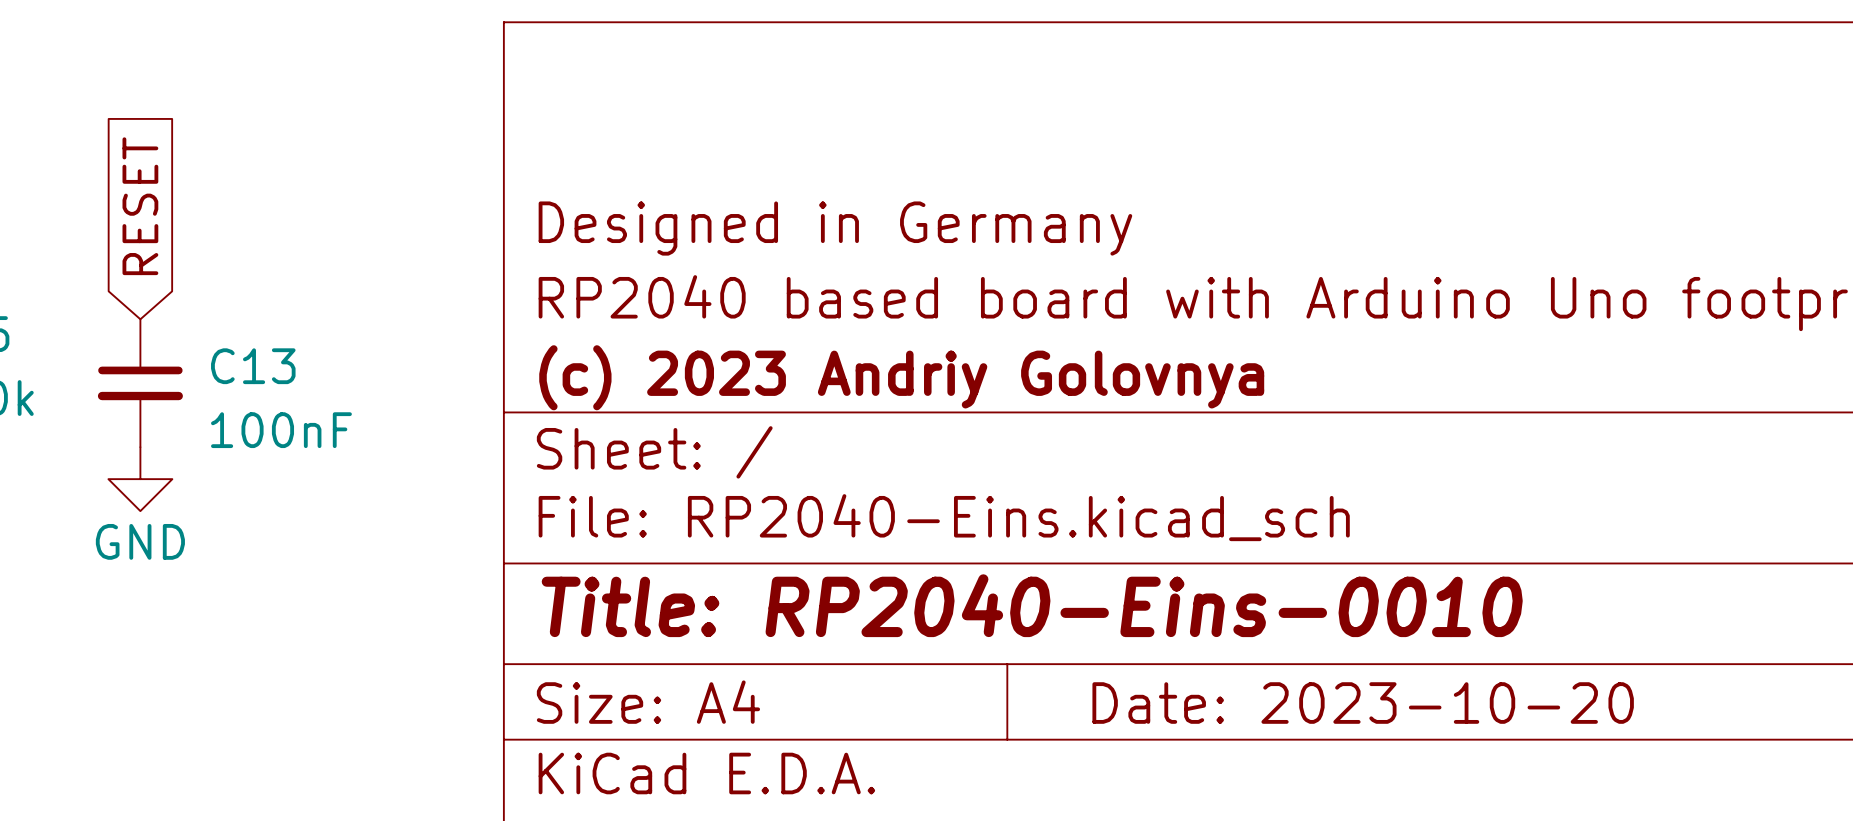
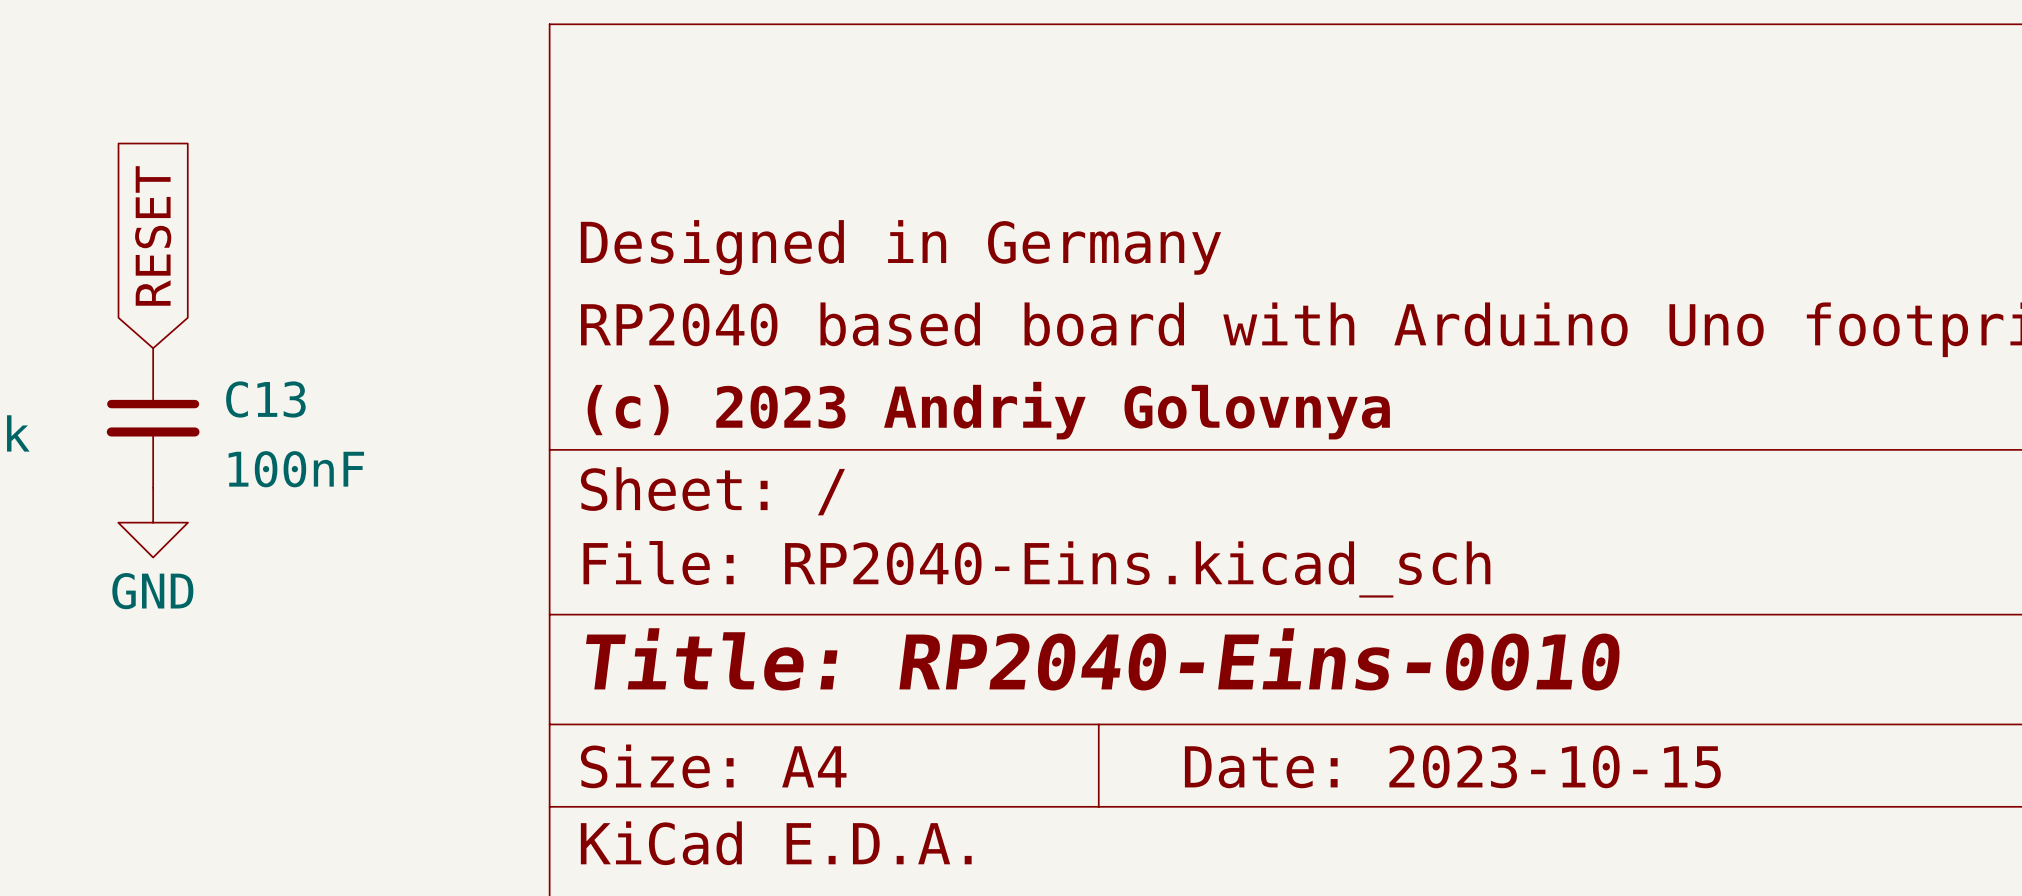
title block: Date: 2023-10-20 (1363, 703) -> Date: 2023-10-15 (1452, 766)

